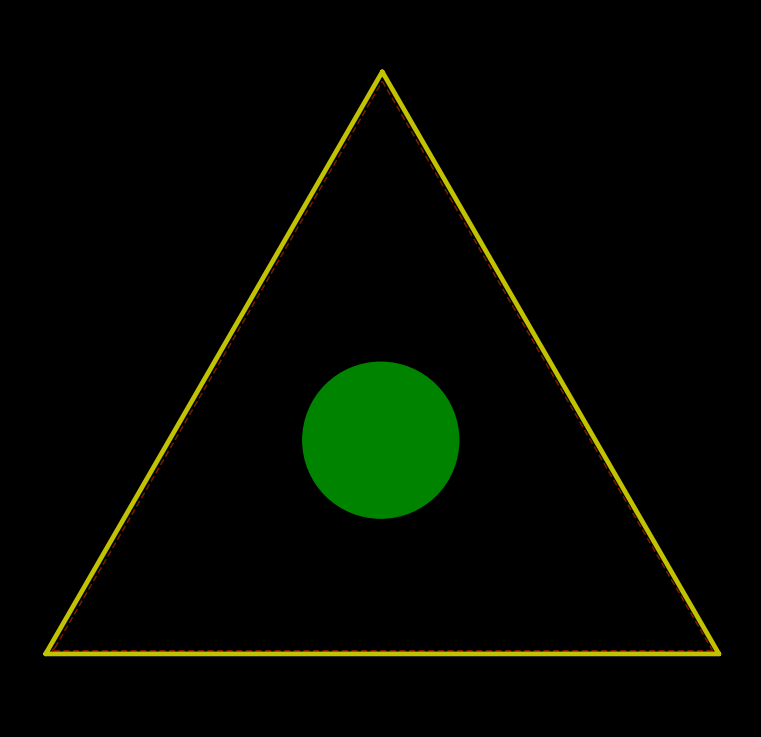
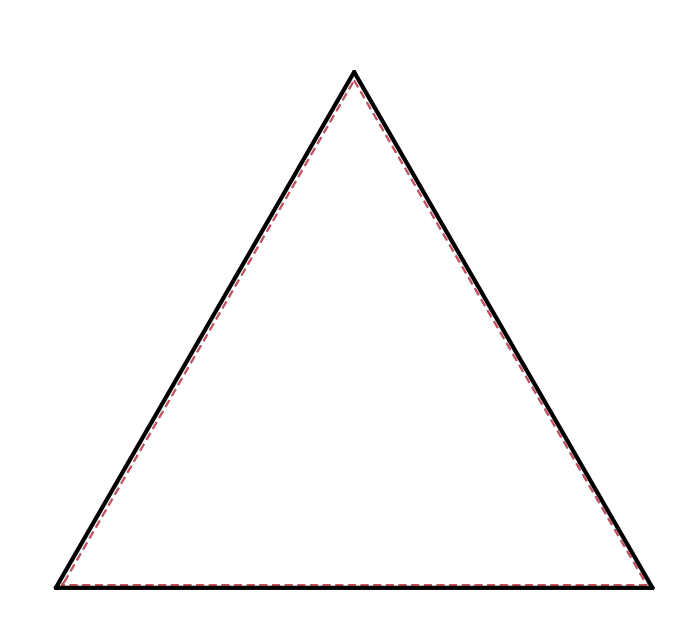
part: (380, 440) -> none

